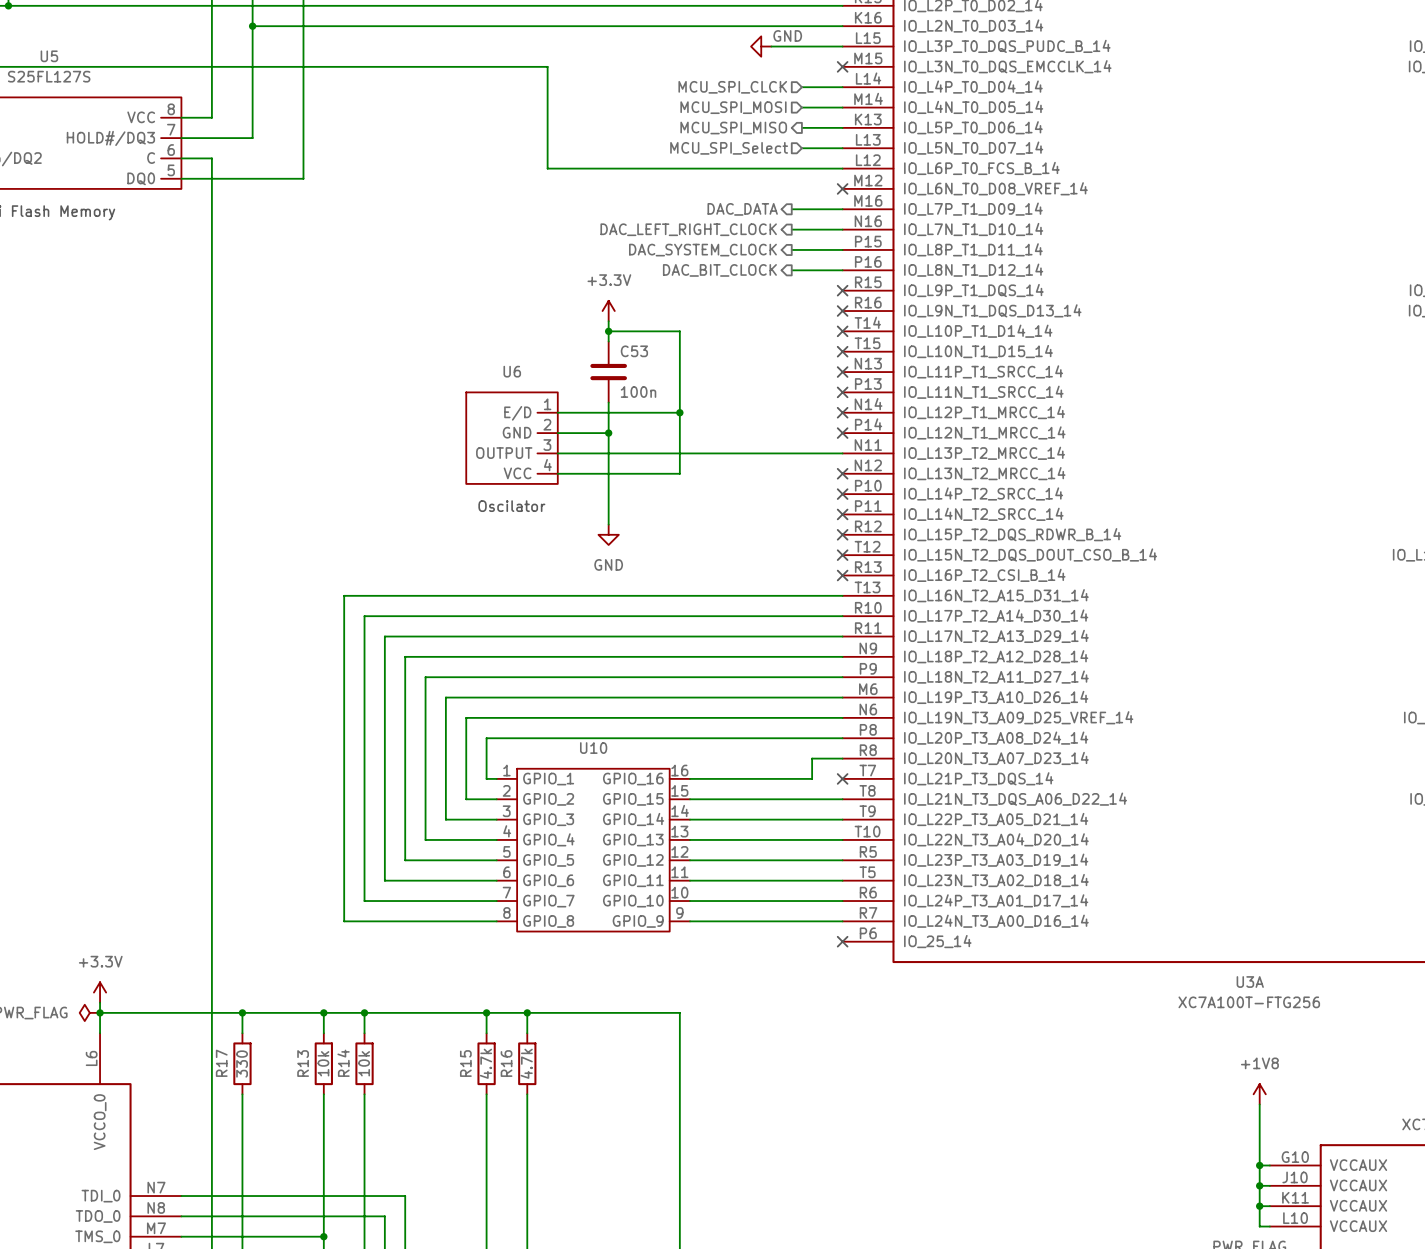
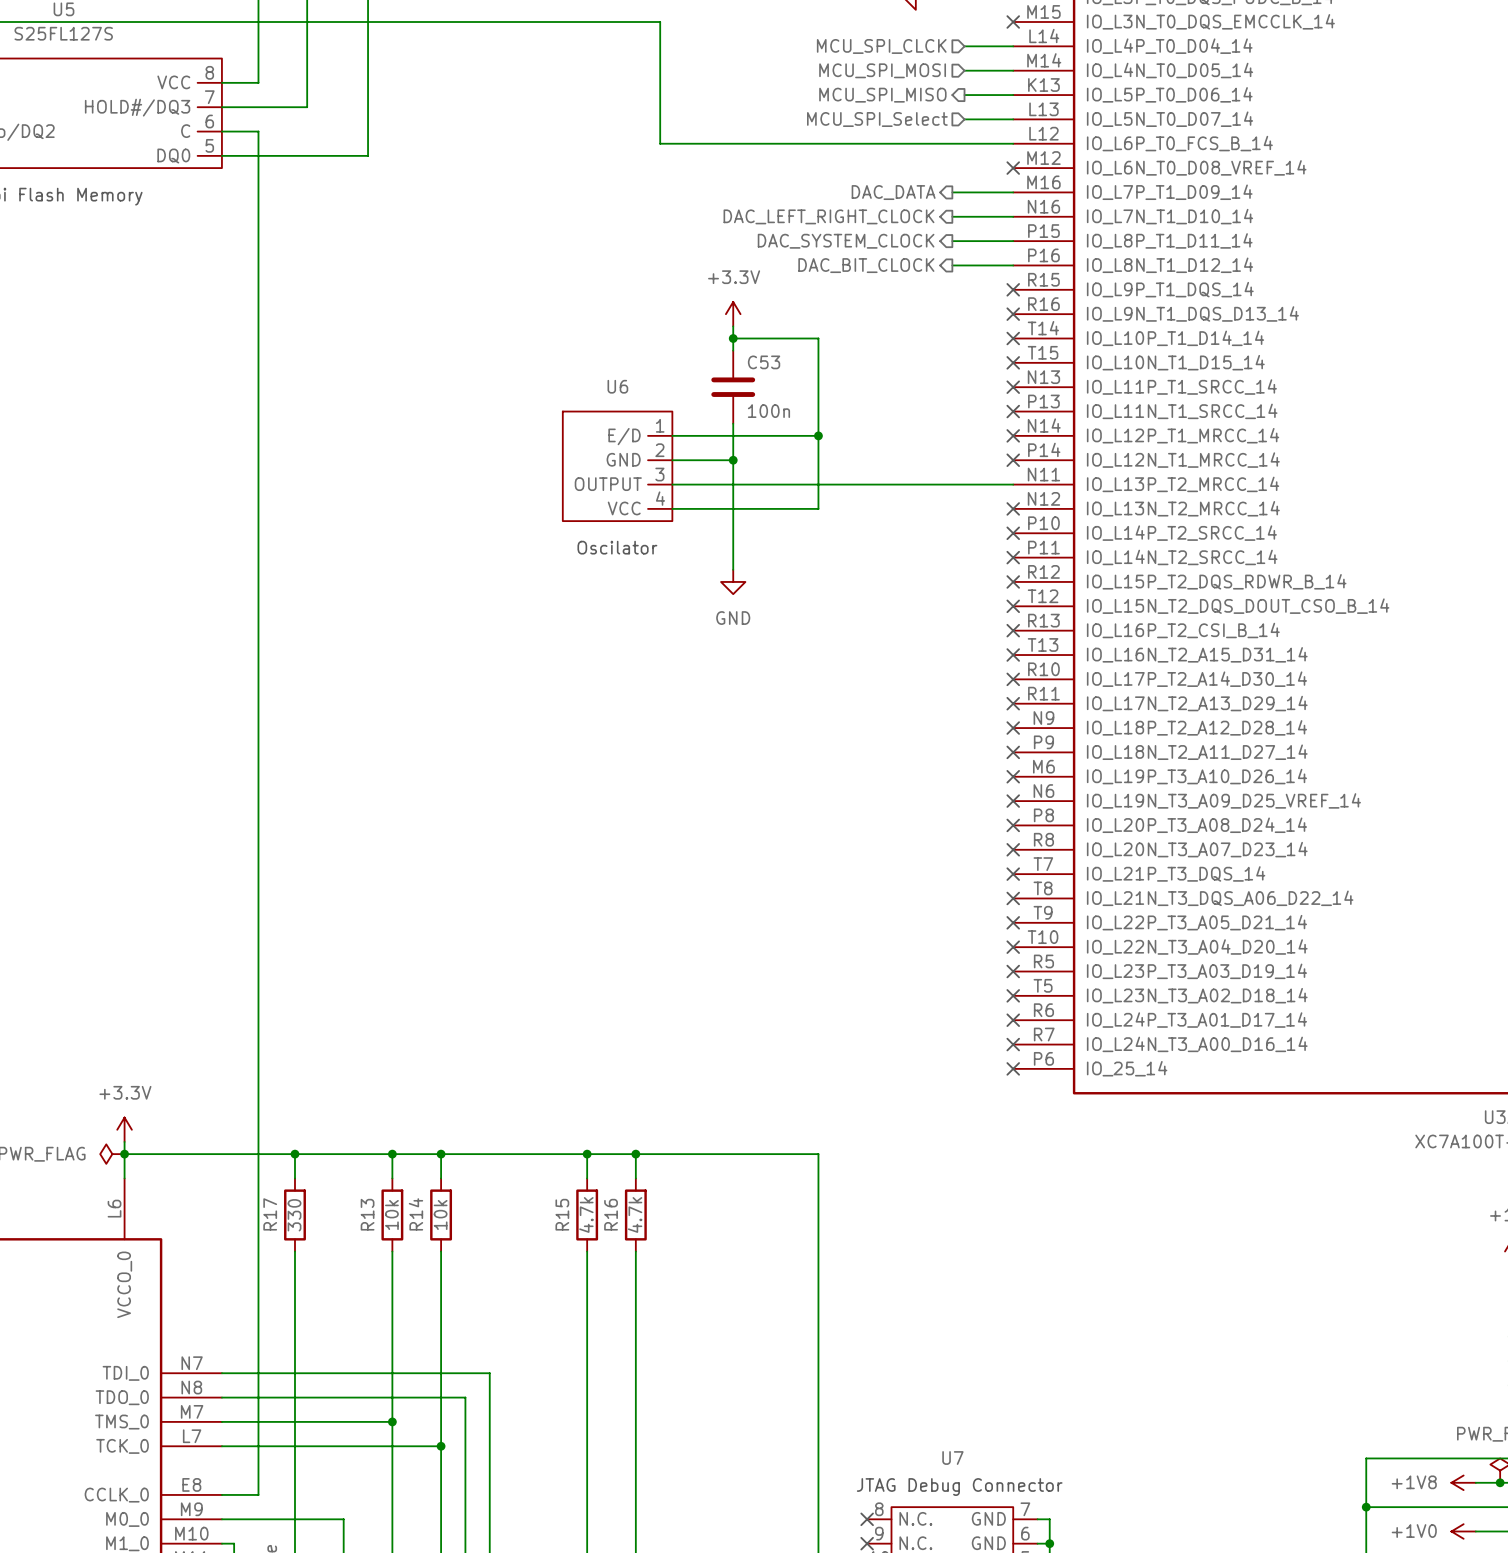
wire: (842, 595) (344, 595) (344, 921) (496, 921) -> none
no-connect mark: none -> (1013, 655)
wire: (842, 616) (364, 616) (364, 901) (496, 901) -> none
no-connect mark: none -> (1013, 679)
wire: (842, 636) (384, 636) (384, 880) (496, 880) -> none
no-connect mark: none -> (1013, 703)
wire: (842, 656) (405, 656) (405, 860) (496, 860) -> none
no-connect mark: none -> (1013, 728)
wire: (842, 677) (425, 677) (425, 839) (496, 839) -> none
no-connect mark: none -> (1013, 752)
wire: (842, 697) (445, 697) (445, 819) (496, 819) -> none
no-connect mark: none -> (1013, 776)
wire: (842, 717) (466, 717) (466, 799) (496, 799) -> none
no-connect mark: none -> (1013, 801)
wire: (842, 738) (486, 738) (486, 778) (496, 778) -> none
no-connect mark: none -> (1013, 825)
wire: (842, 758) (812, 758) (812, 778) (690, 778) -> none
no-connect mark: none -> (1013, 849)
wire: (690, 799) (842, 799) -> none
no-connect mark: none -> (1013, 898)
wire: (690, 819) (842, 819) -> none
no-connect mark: none -> (1013, 922)
wire: (690, 839) (842, 839) -> none
no-connect mark: none -> (1013, 947)
U10: (593, 850) -> none
wire: (690, 860) (842, 860) -> none
no-connect mark: none -> (1013, 971)
wire: (690, 880) (842, 880) -> none
no-connect mark: none -> (1013, 995)
wire: (690, 901) (842, 901) -> none
no-connect mark: none -> (1013, 1020)
wire: (690, 921) (842, 921) -> none
no-connect mark: none -> (1013, 1044)

